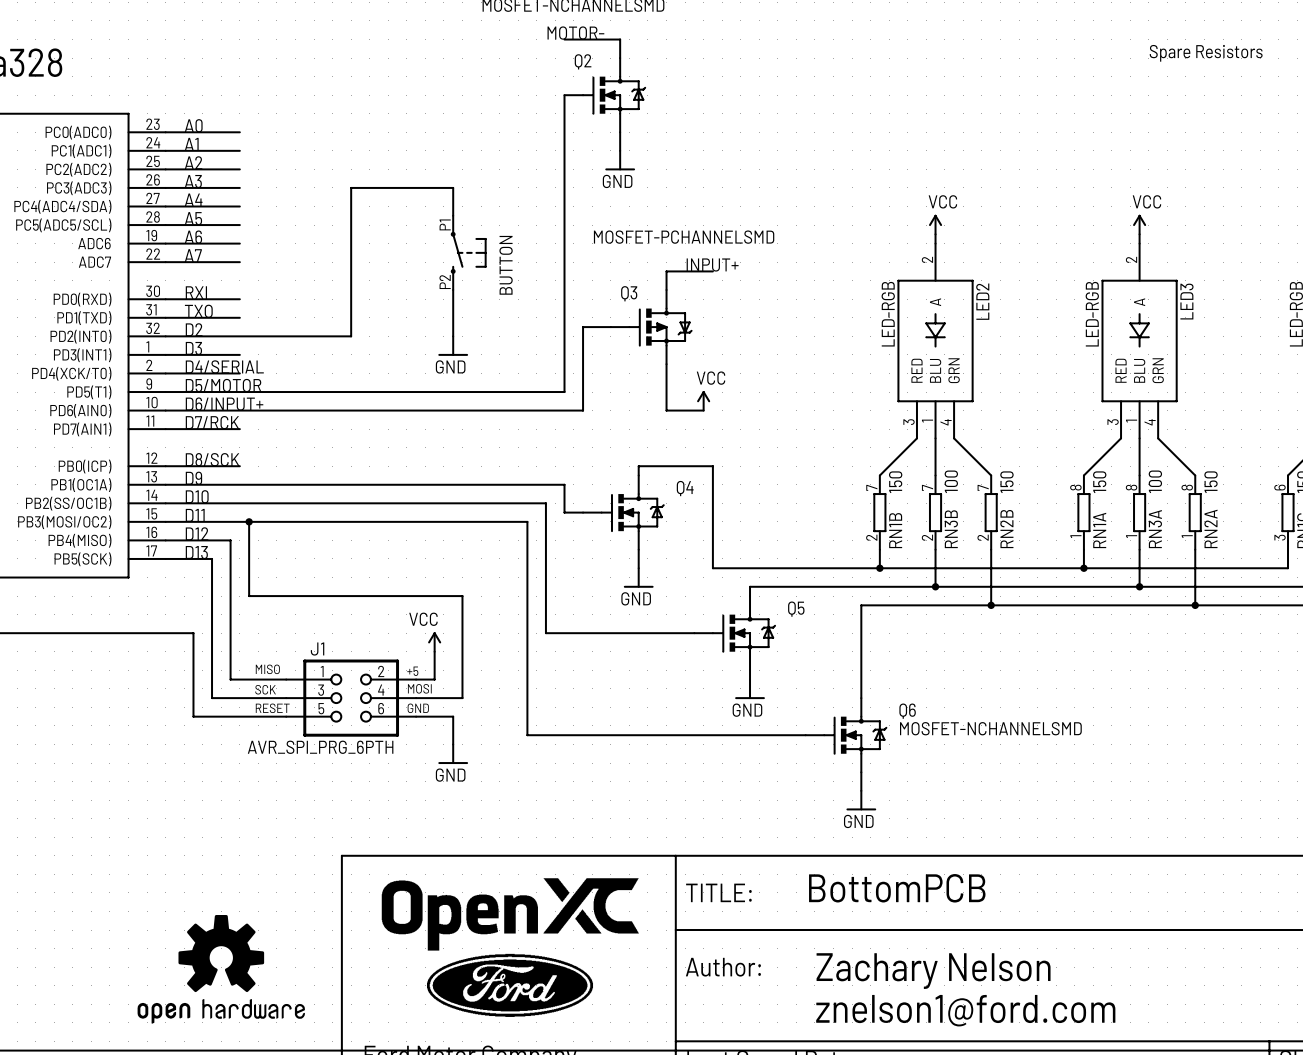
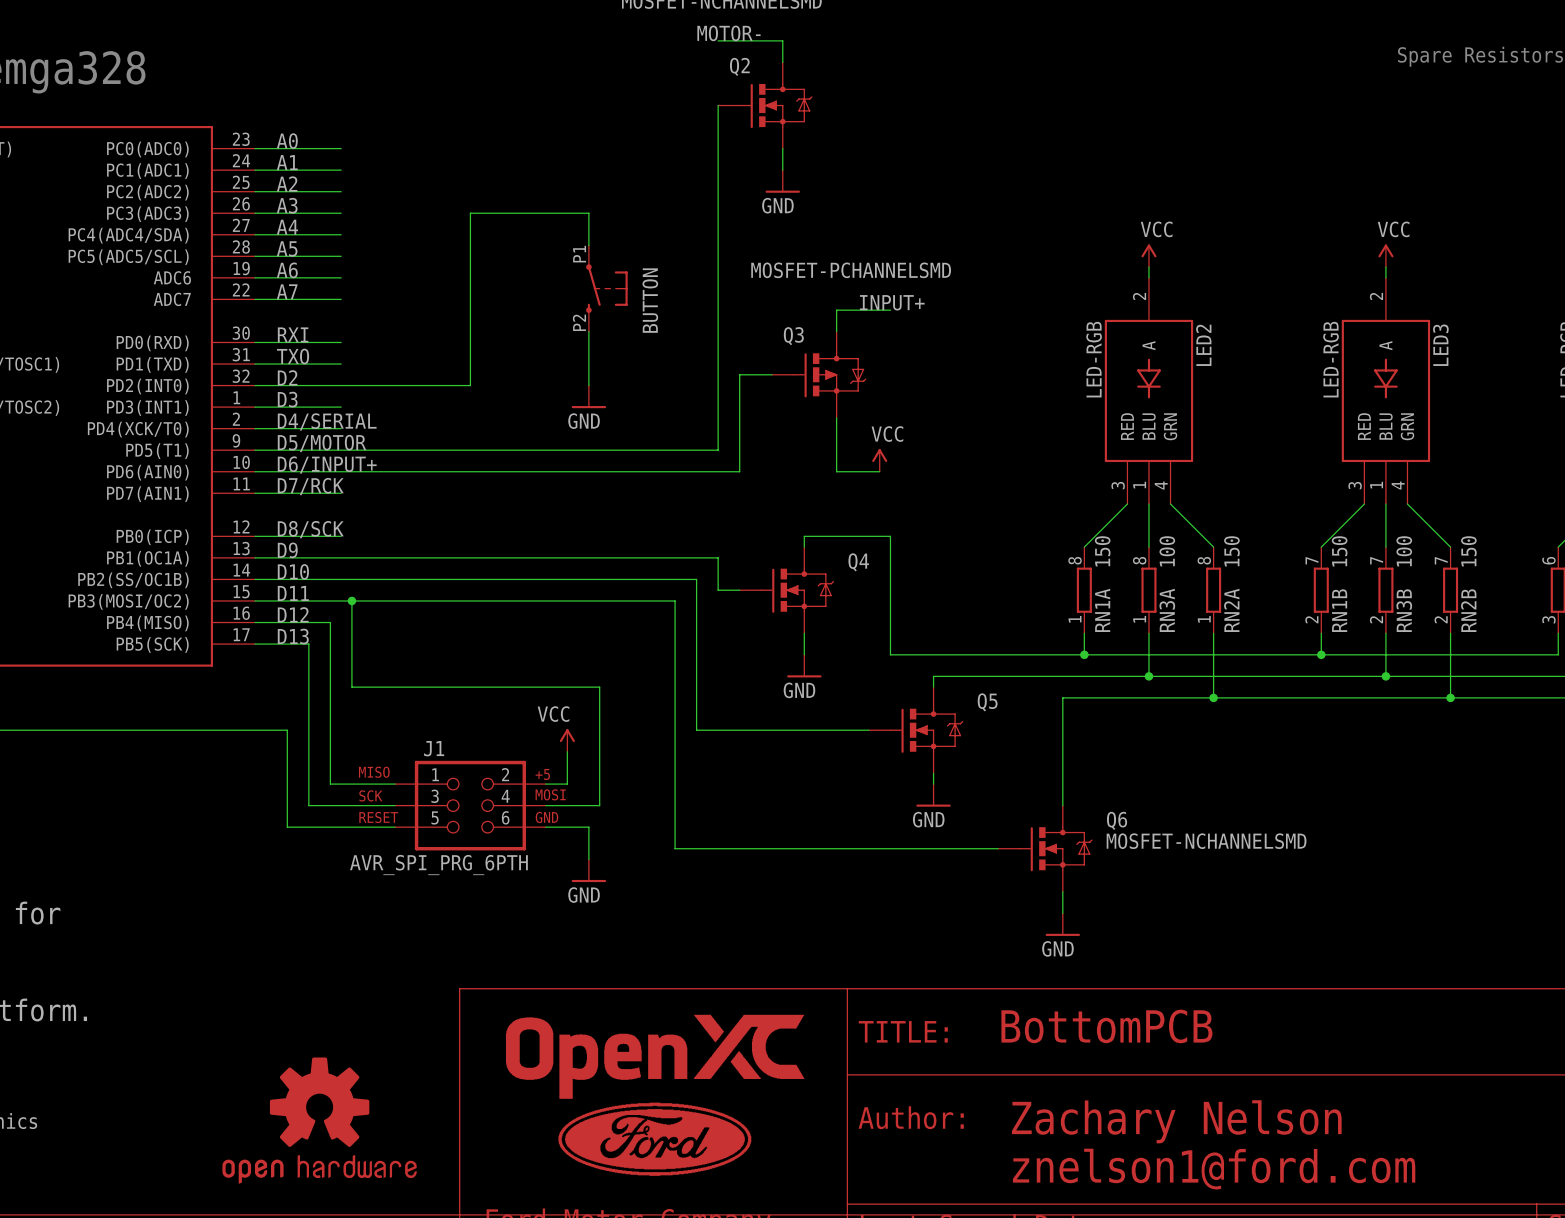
RN1B position: (879, 512) -> (1321, 590)
RN3B position: (935, 512) -> (1385, 590)
RN2B position: (991, 512) -> (1450, 590)
RN1A position: (1083, 512) -> (1084, 590)
RN3A position: (1139, 512) -> (1148, 590)
RN2A position: (1195, 512) -> (1213, 590)

